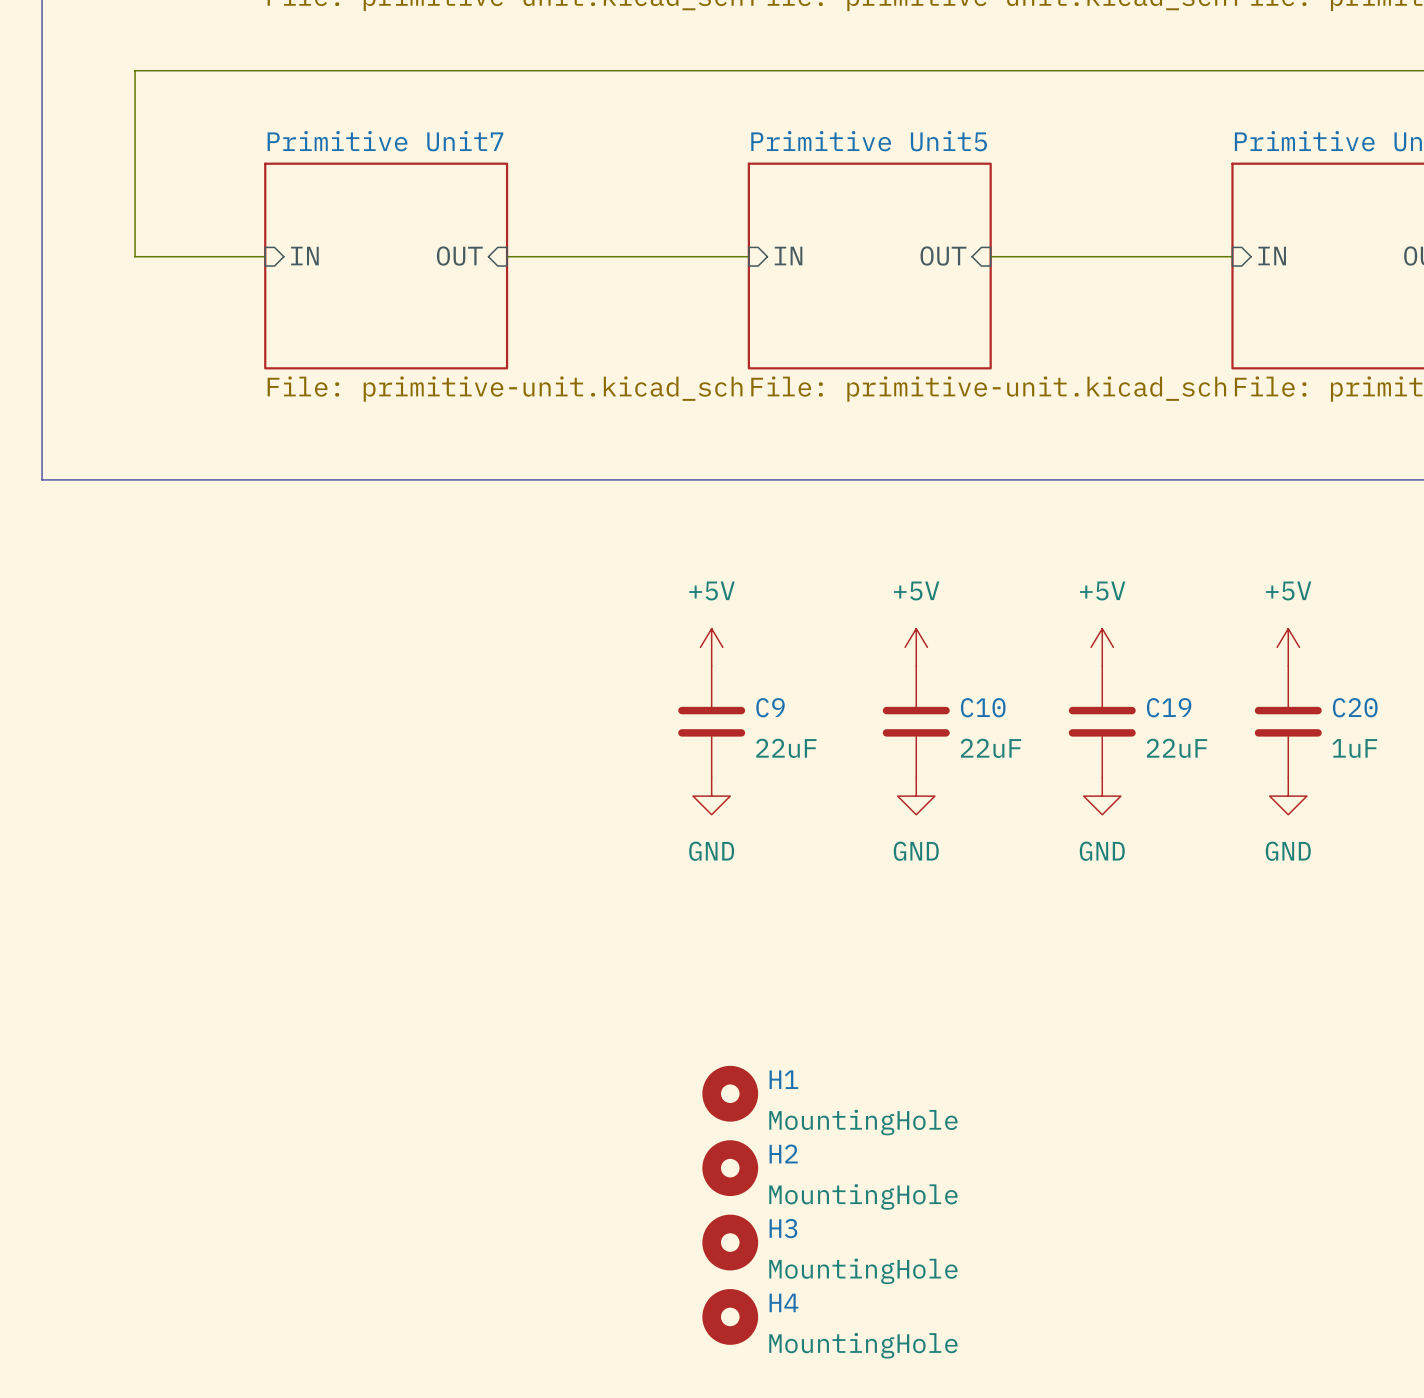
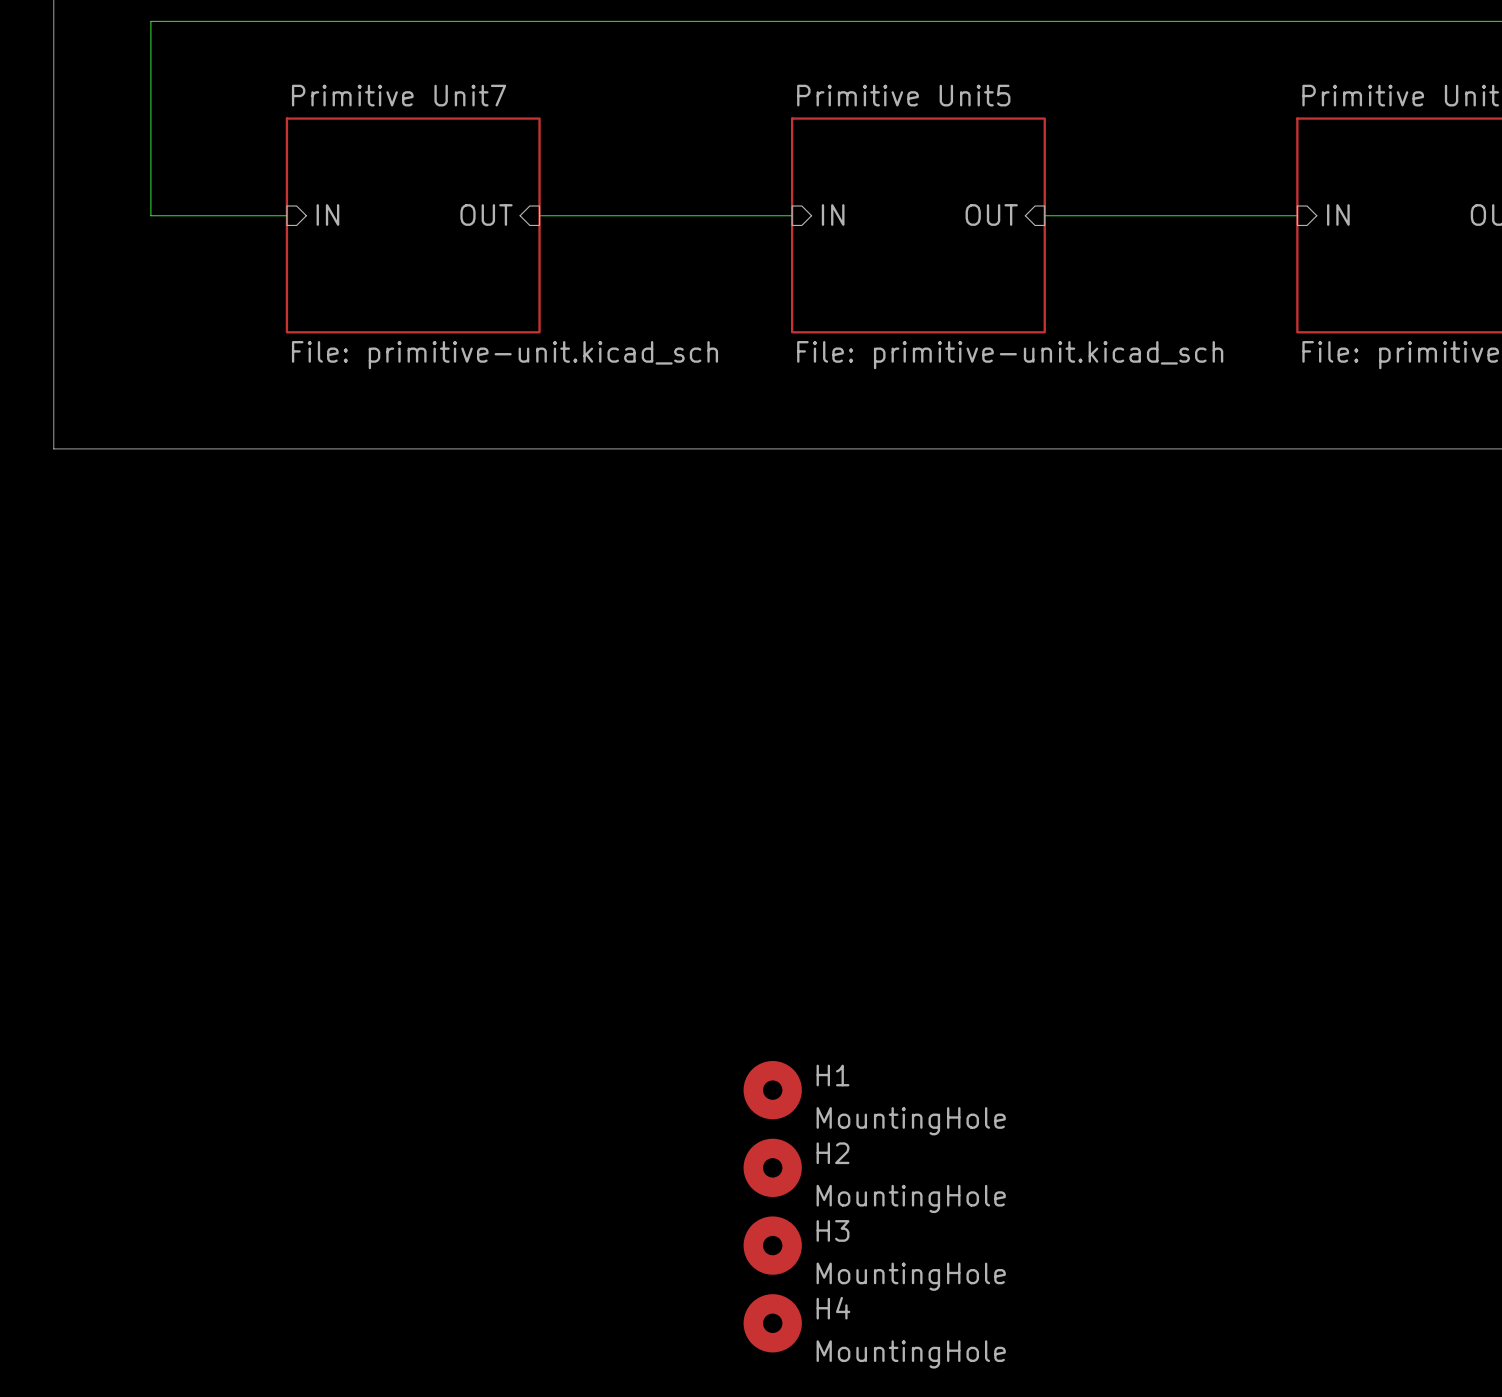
power symbol: +5V (711, 647) -> none
power symbol: +5V (916, 647) -> none
power symbol: +5V (1102, 647) -> none
power symbol: +5V (1288, 647) -> none
C9: 22uF (711, 721) -> none
C10: 22uF (916, 721) -> none
C19: 22uF (1102, 721) -> none
C20: 1uF (1288, 721) -> none
power symbol: GND (711, 796) -> none
power symbol: GND (916, 796) -> none
power symbol: GND (1102, 796) -> none
power symbol: GND (1288, 796) -> none

